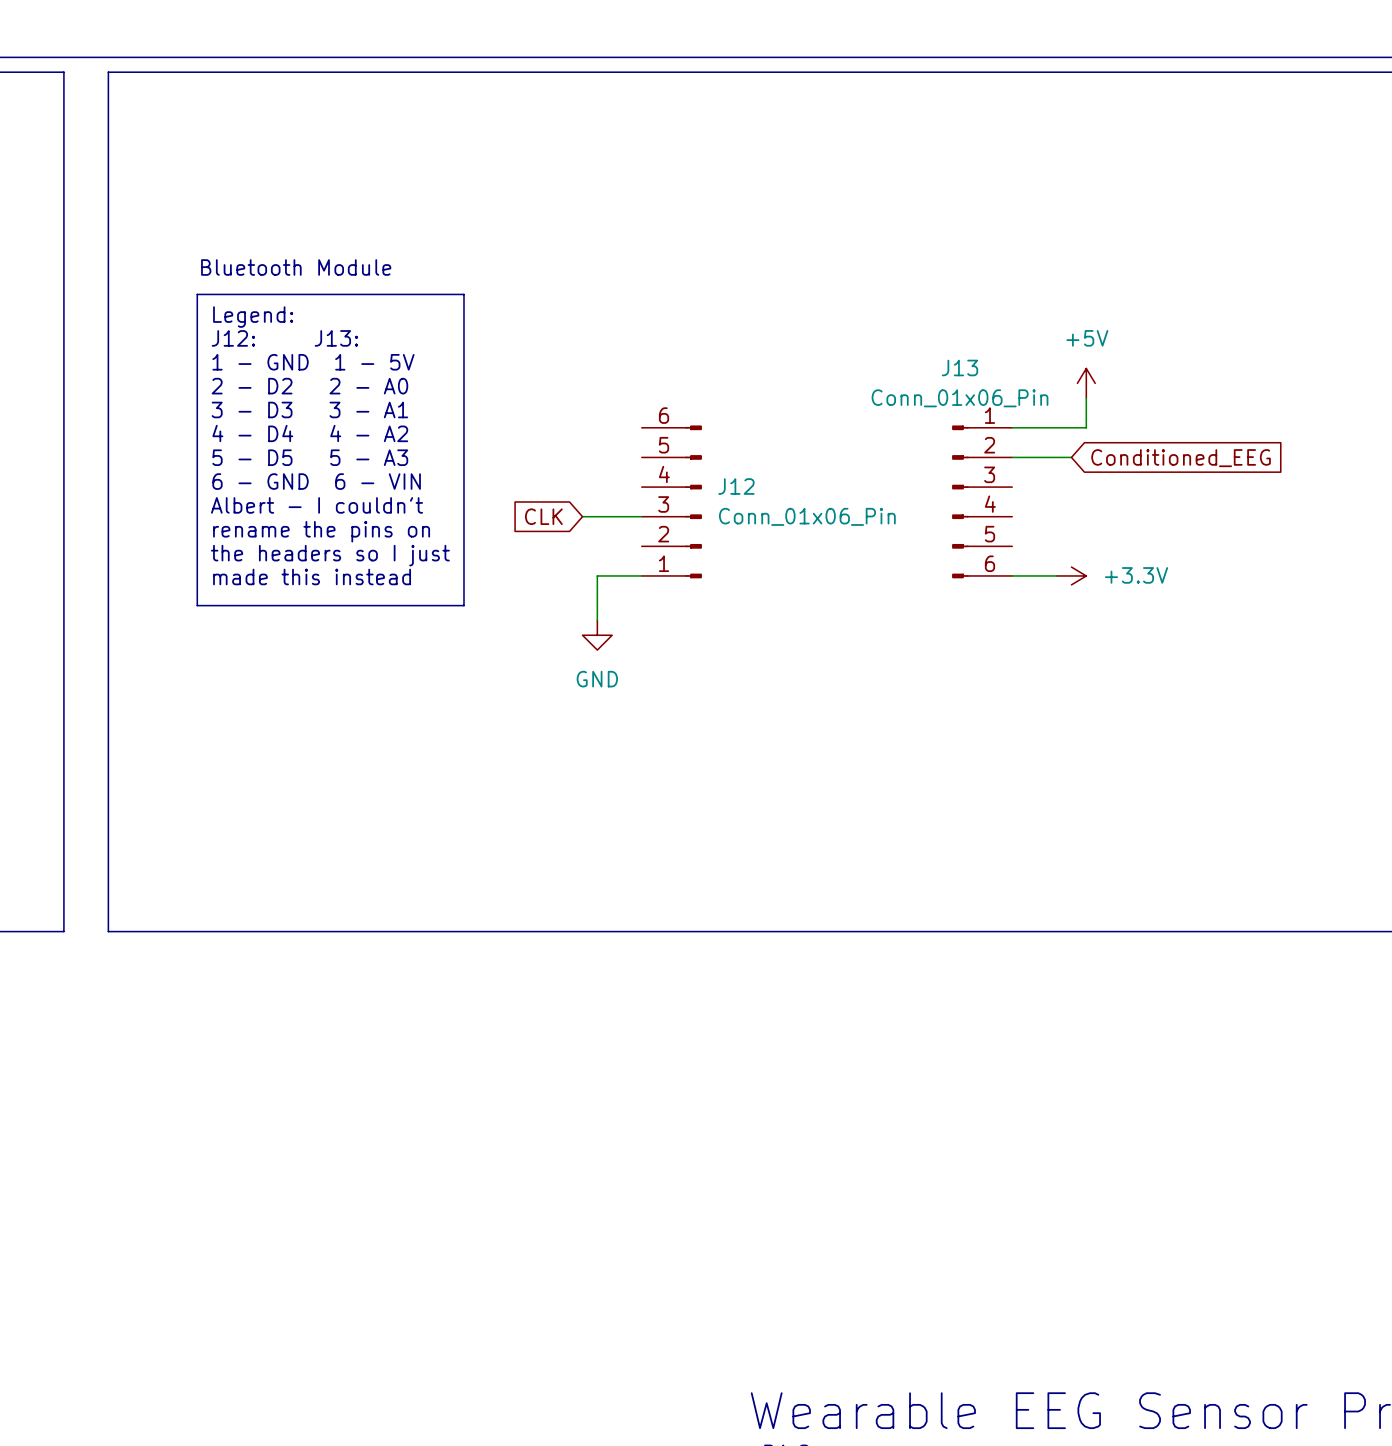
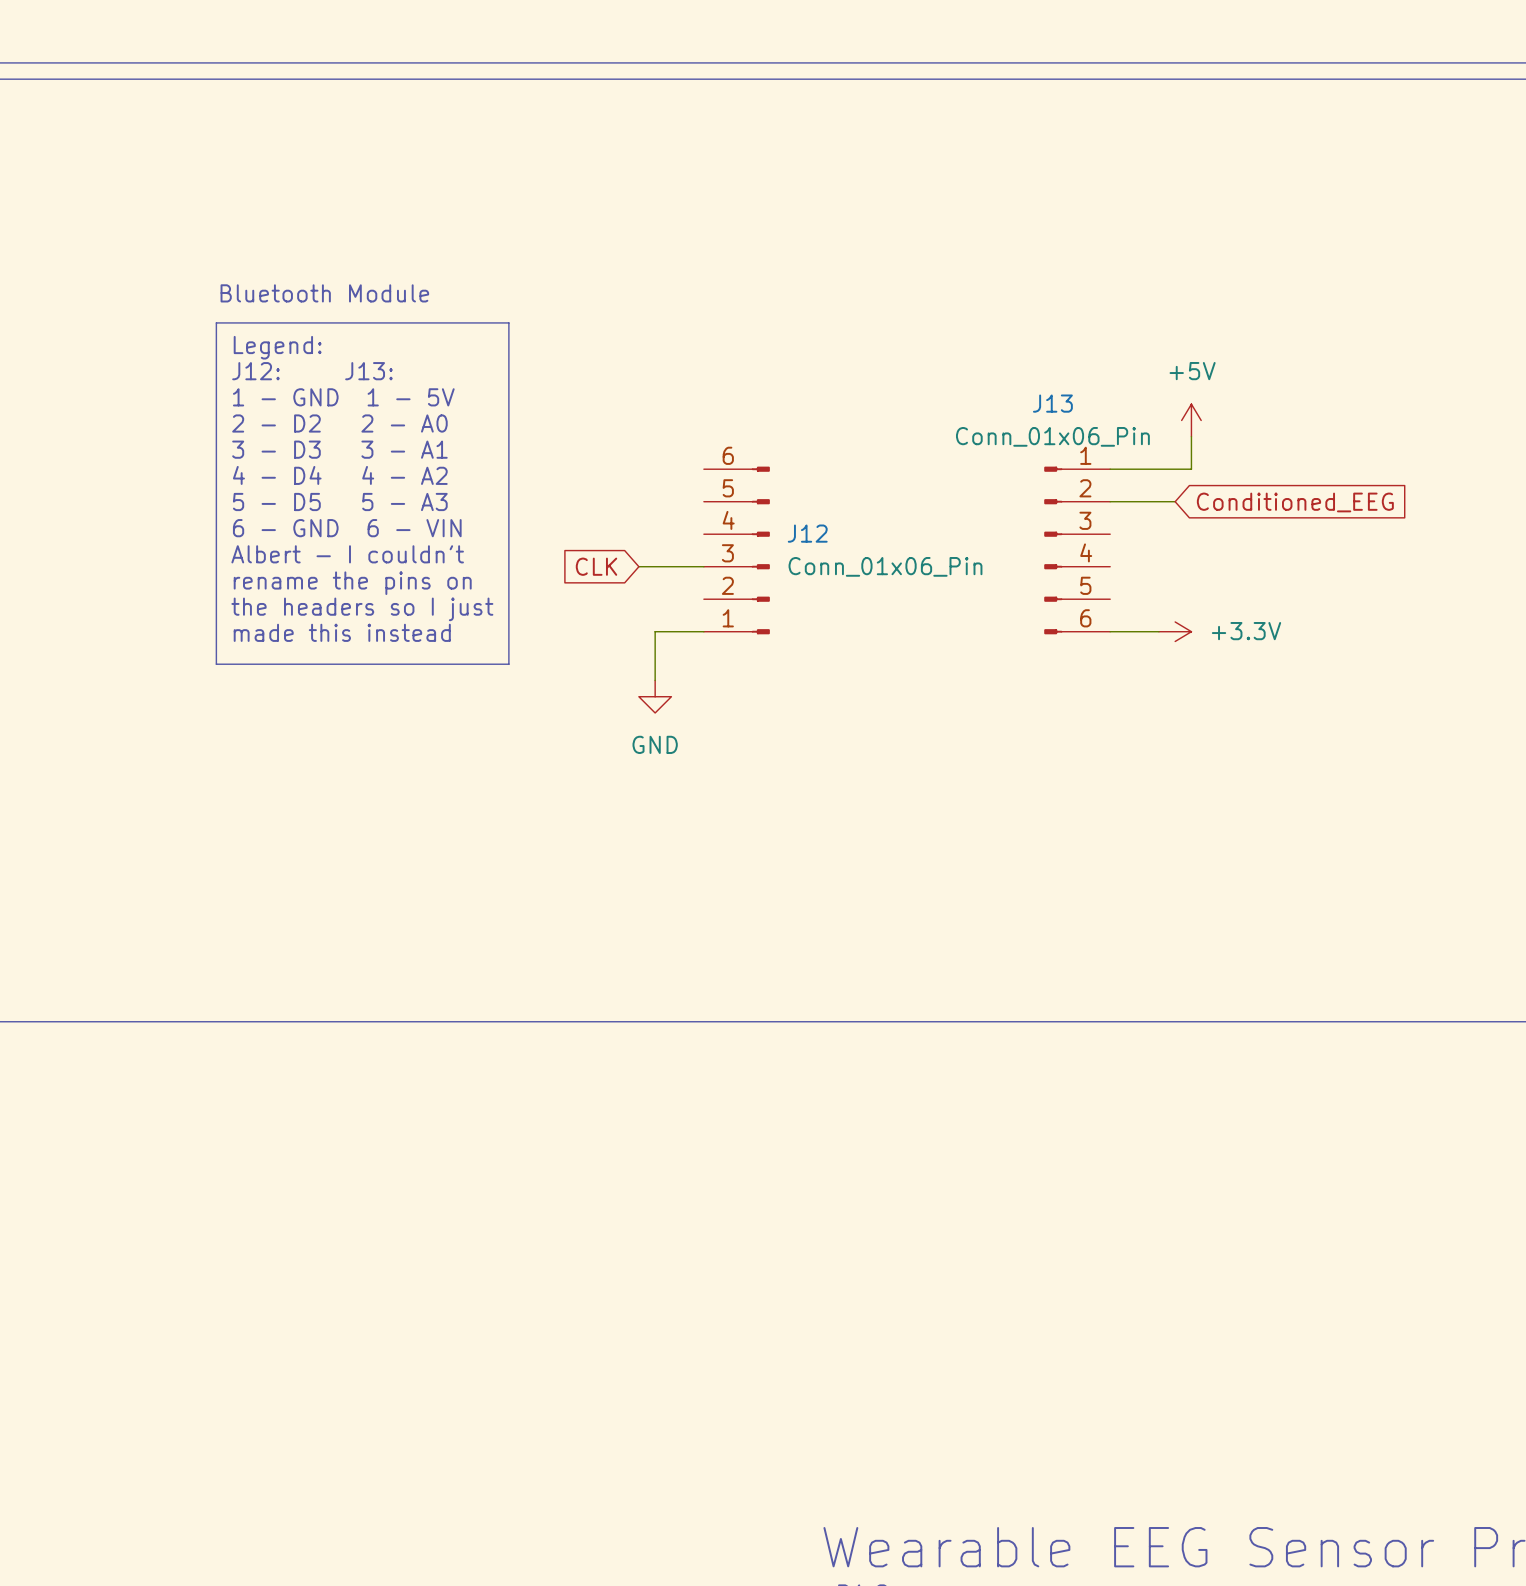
line: (63, 72) (63, 931) -> (70, 79) (118, 79)
line: (108, 72) (108, 931) -> (70, 1021) (118, 1021)

